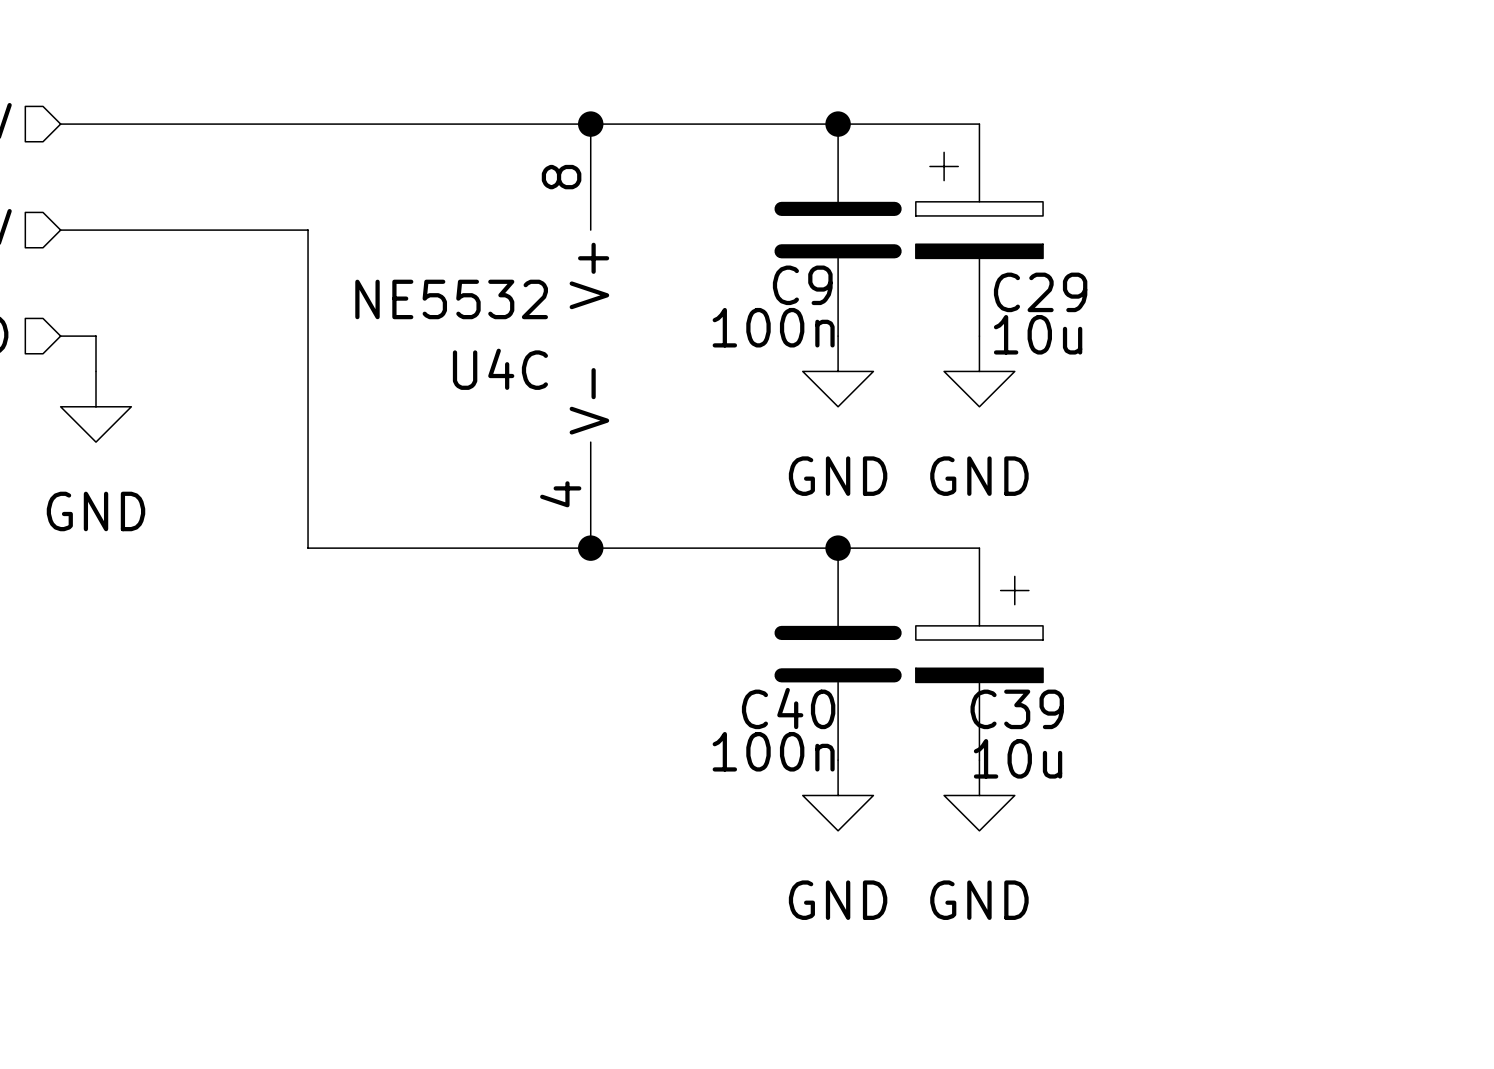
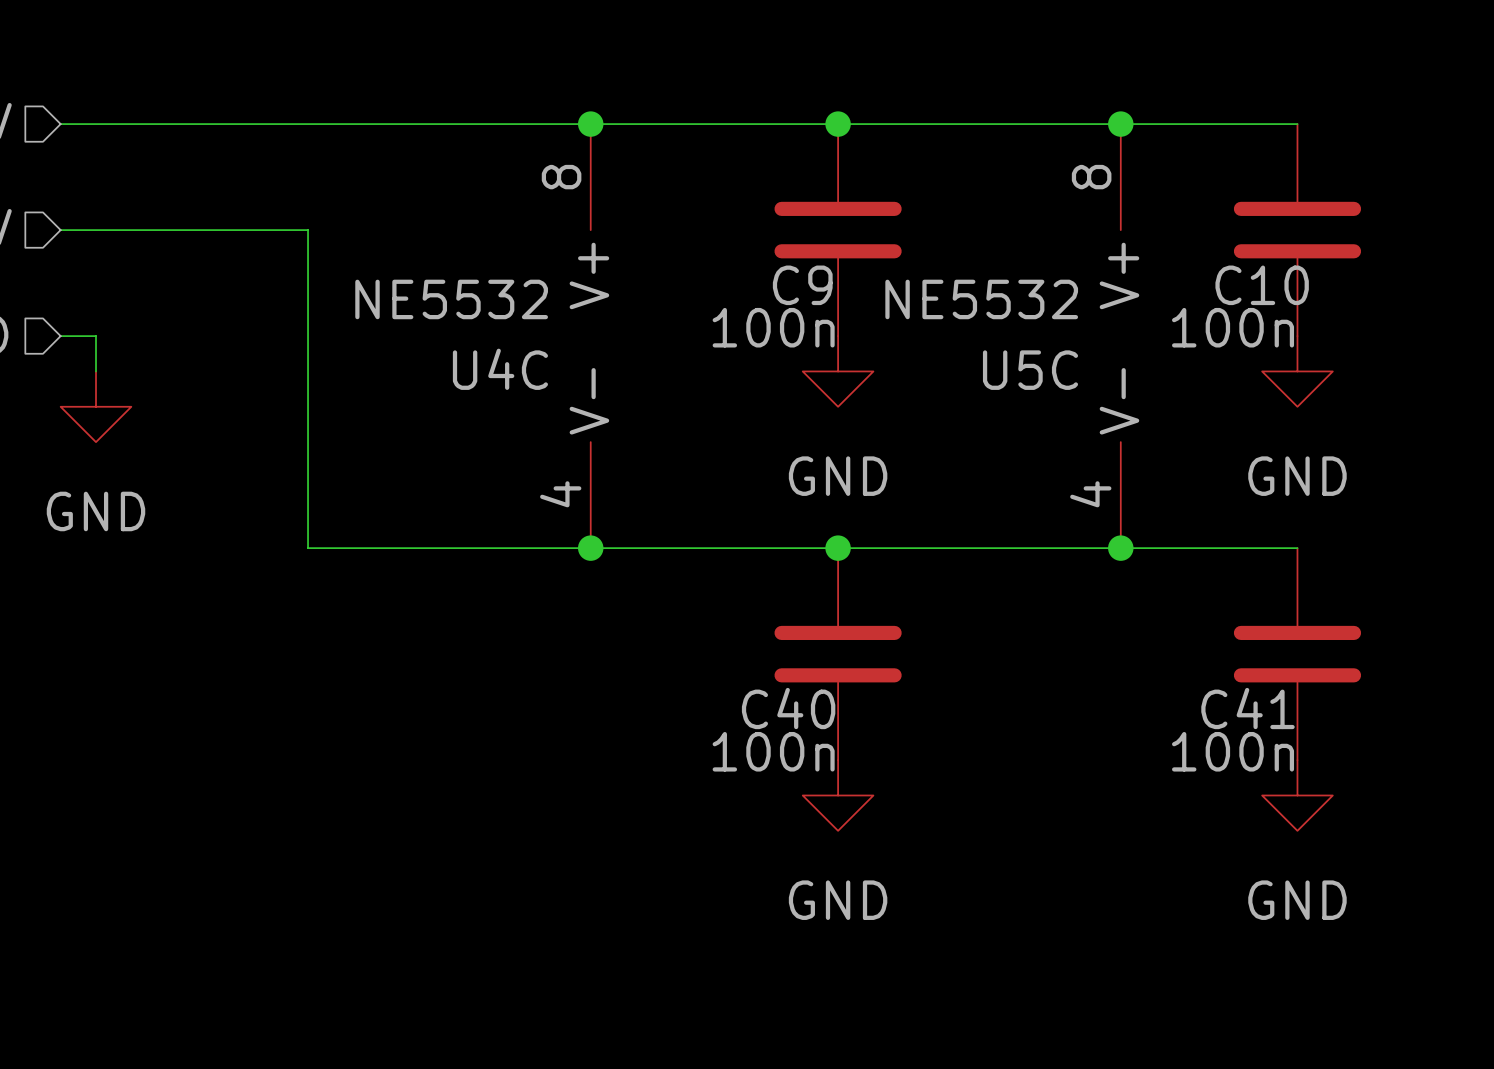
wire: none -> (979, 124) (1297, 124)
junction: none -> (1120, 124)
C29: 10u (979, 230) -> none
C10: none -> 100n (1297, 230)
U5C: none -> NE5532 (1120, 336)
power symbol: GND (979, 371) -> none
power symbol: none -> GND (1297, 371)
wire: none -> (979, 548) (1297, 548)
junction: none -> (1120, 548)
C39: 10u (979, 654) -> none
C41: none -> 100n (1297, 654)
power symbol: GND (979, 795) -> none
power symbol: none -> GND (1297, 795)

